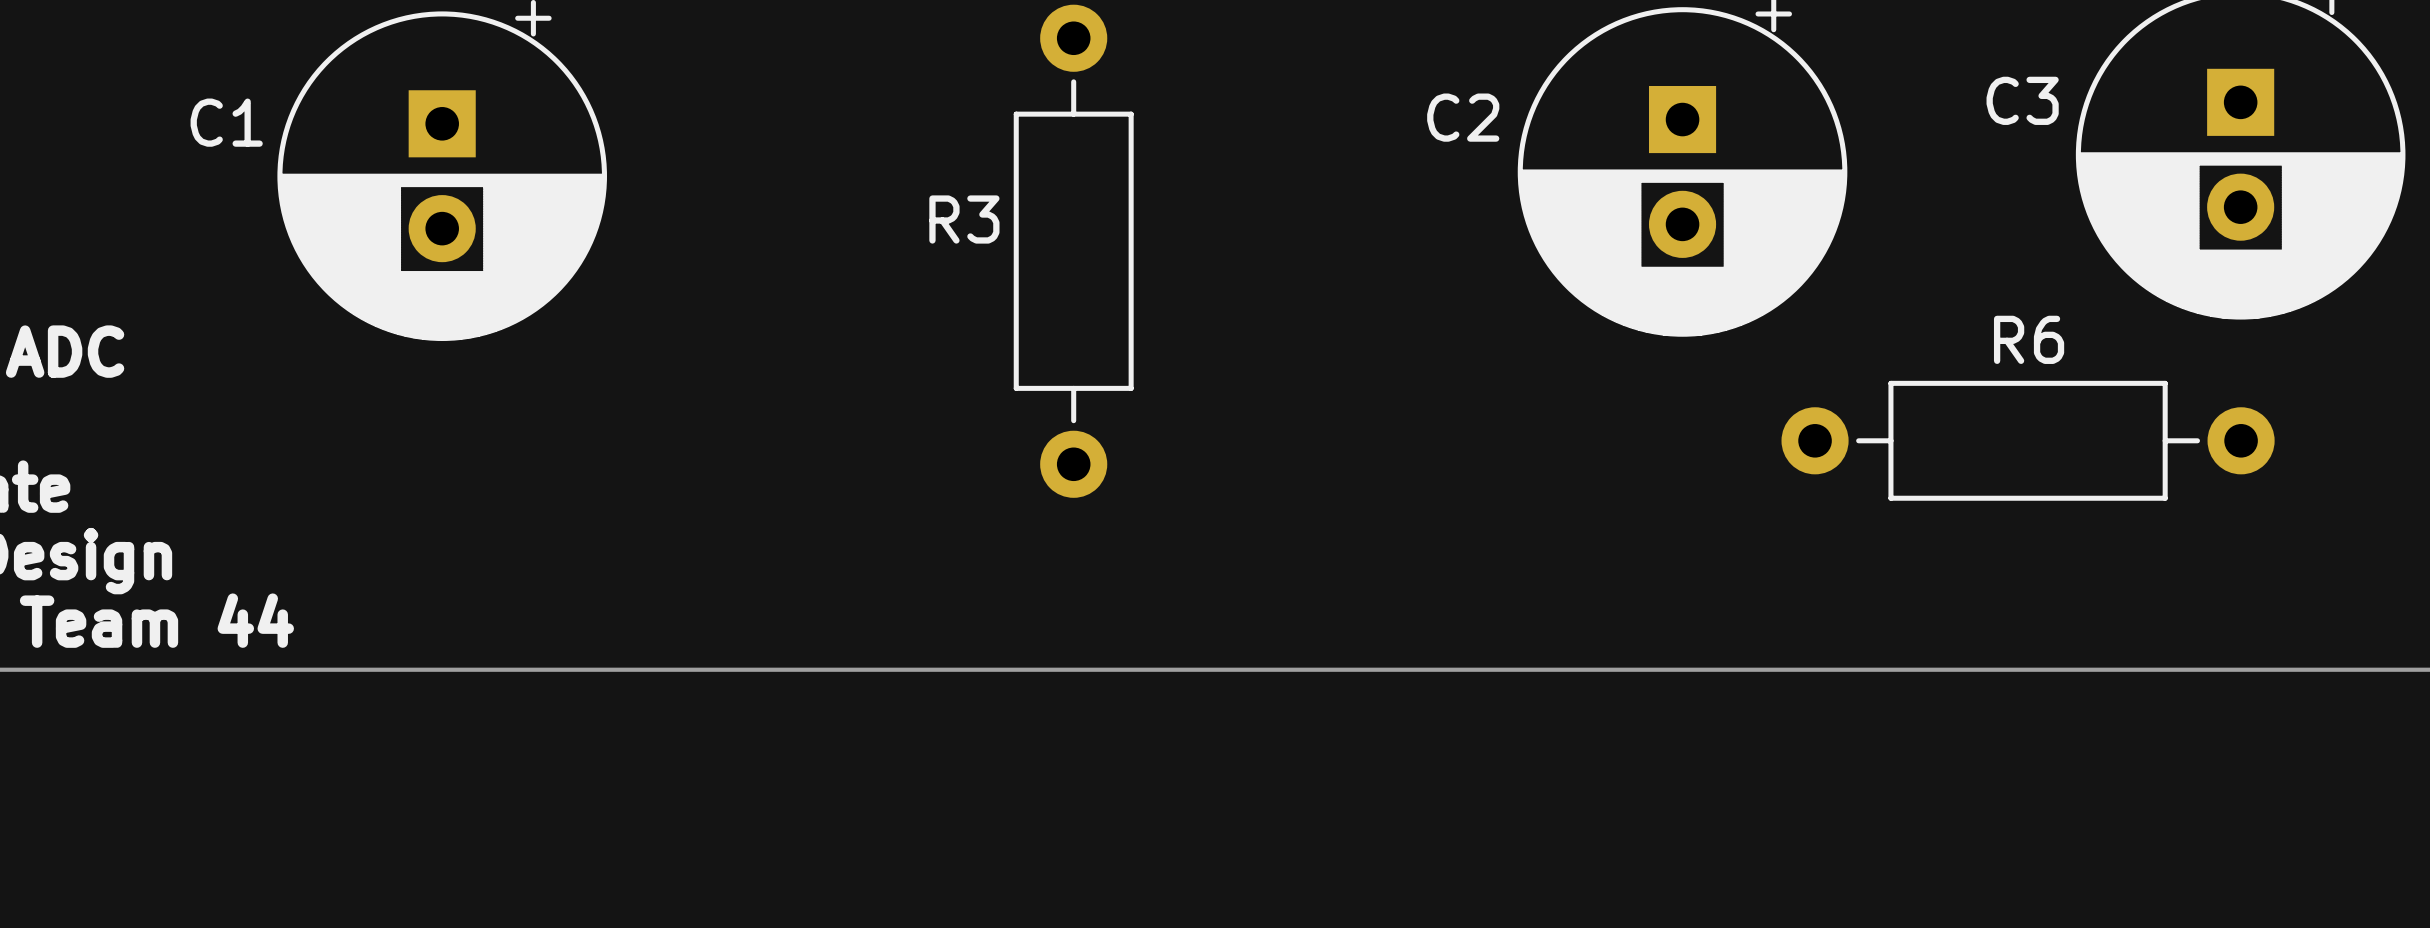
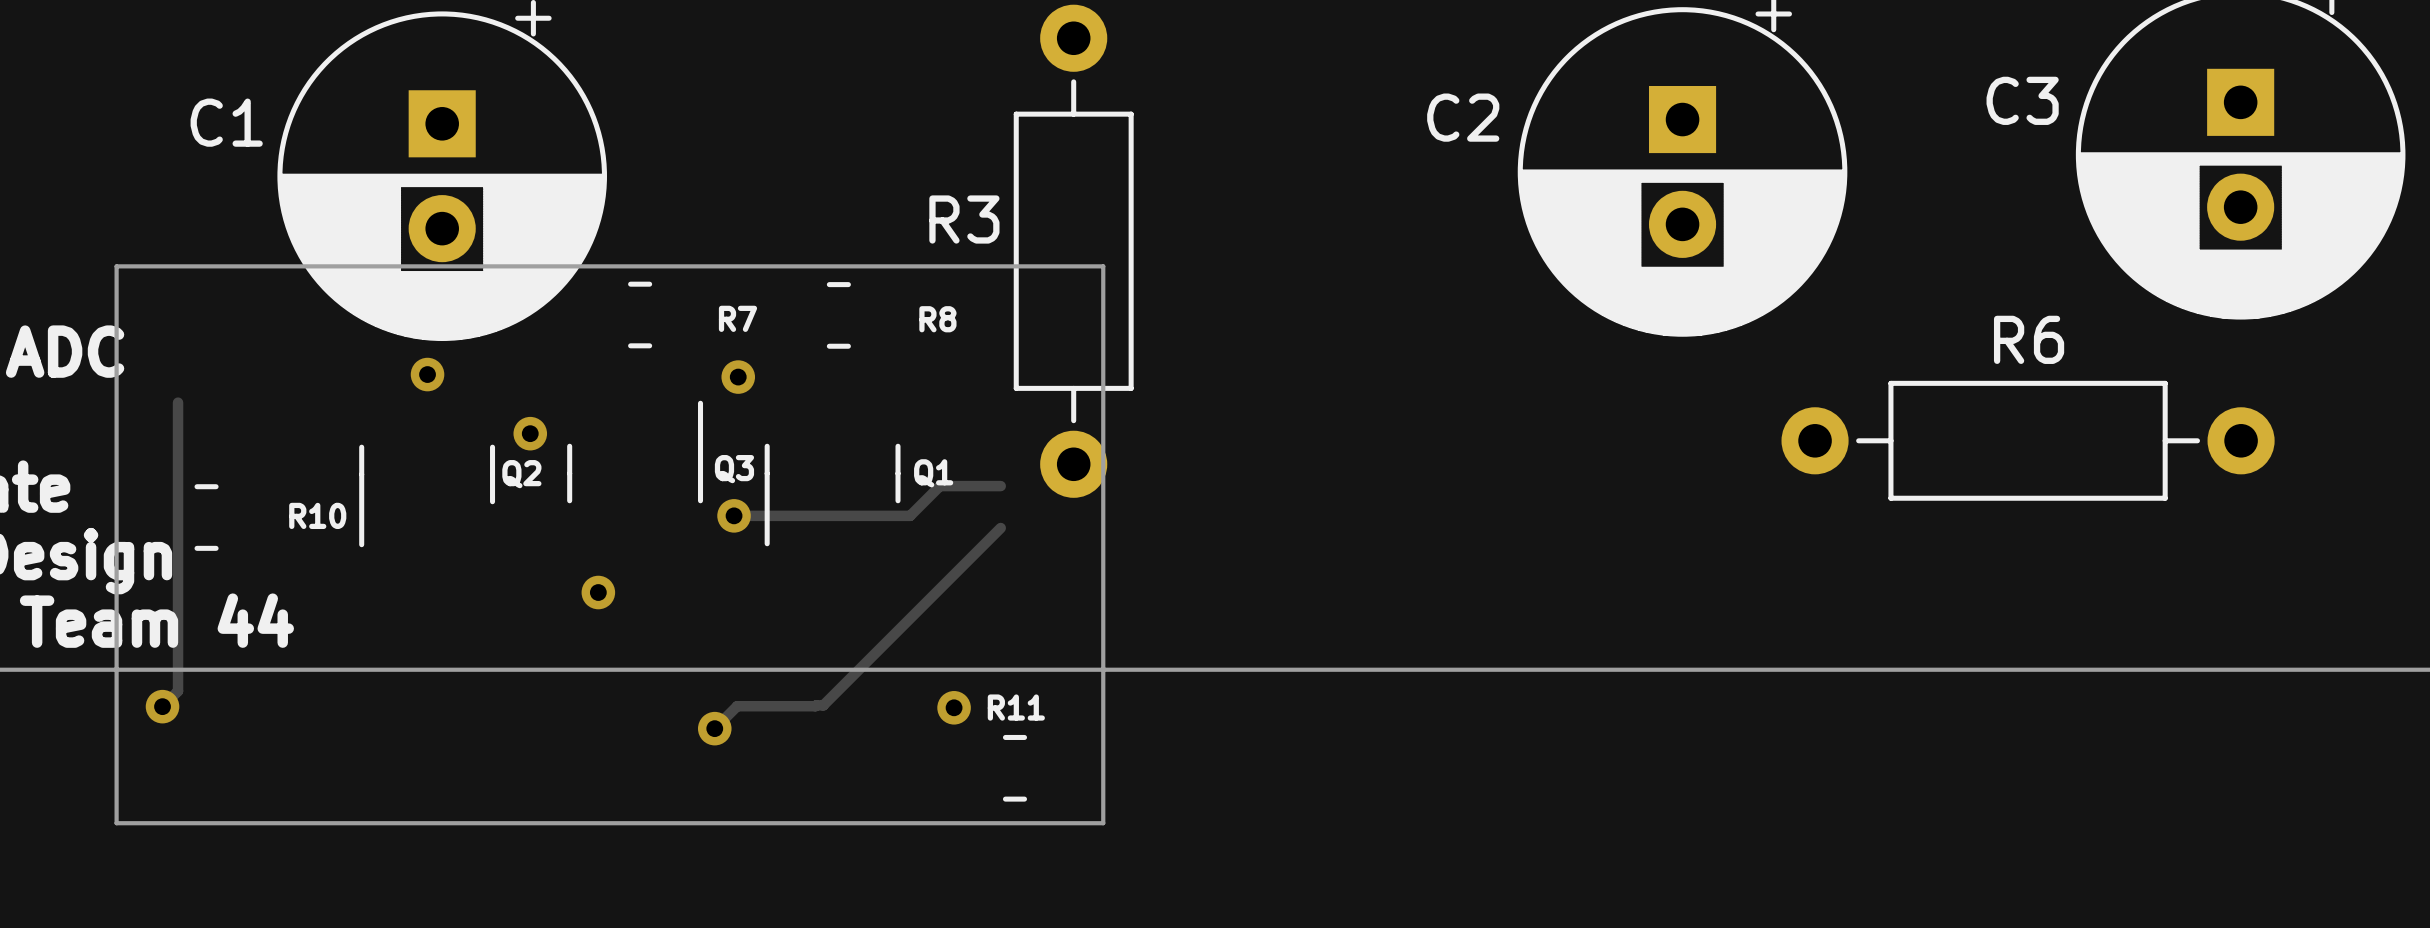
board edge: none -> (116, 266) (1103, 266) (1103, 823) (116, 823) (116, 266)
R7: none -> (640, 315)
R8: none -> (838, 315)
via: none -> (427, 374)
via: none -> (738, 377)
track: none -> (178, 402) (178, 691) (162, 706)
via: none -> (530, 433)
Q3: none -> (635, 452)
track: none -> (1000, 486) (939, 486) (910, 515) (734, 515)
Q1: none -> (832, 494)
Q2: none -> (427, 495)
via: none -> (734, 515)
R10: none -> (206, 517)
track: none -> (1000, 528) (823, 705) (737, 706) (714, 728)
via: none -> (598, 592)
via: none -> (162, 706)
via: none -> (954, 707)
via: none -> (714, 728)
R11: none -> (1014, 768)

